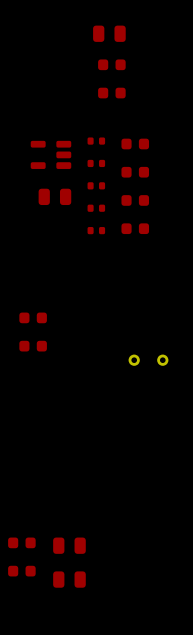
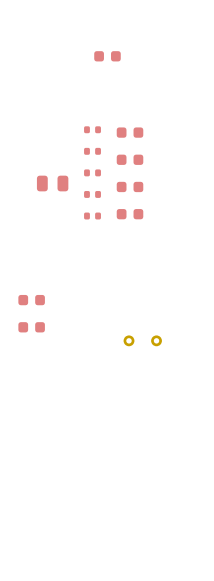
part: (109, 33) -> none
part: (111, 93) -> none
part: (50, 154) -> none
part: (21, 542) -> none
part: (69, 545) -> none
part: (21, 571) -> none
part: (69, 579) -> none

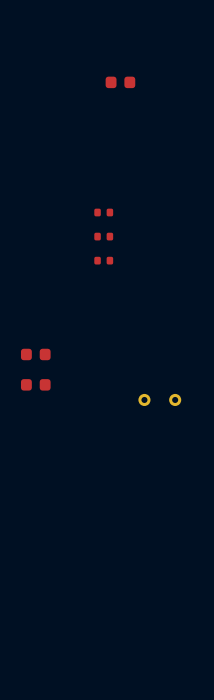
part: (92, 129) -> none
part: (130, 132) -> none
part: (92, 151) -> none
part: (130, 159) -> none
part: (52, 183) -> none
part: (130, 186) -> none
part: (130, 214) -> none

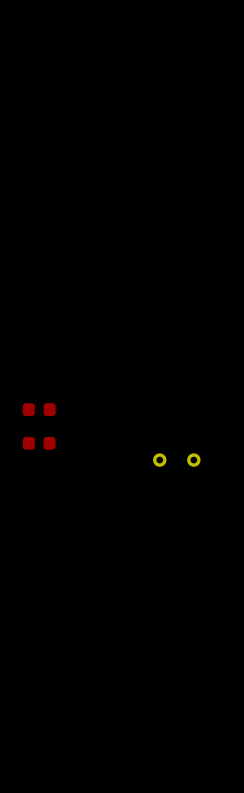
part: (120, 82) -> none
part: (103, 212) -> none
part: (103, 236) -> none
part: (103, 260) -> none

